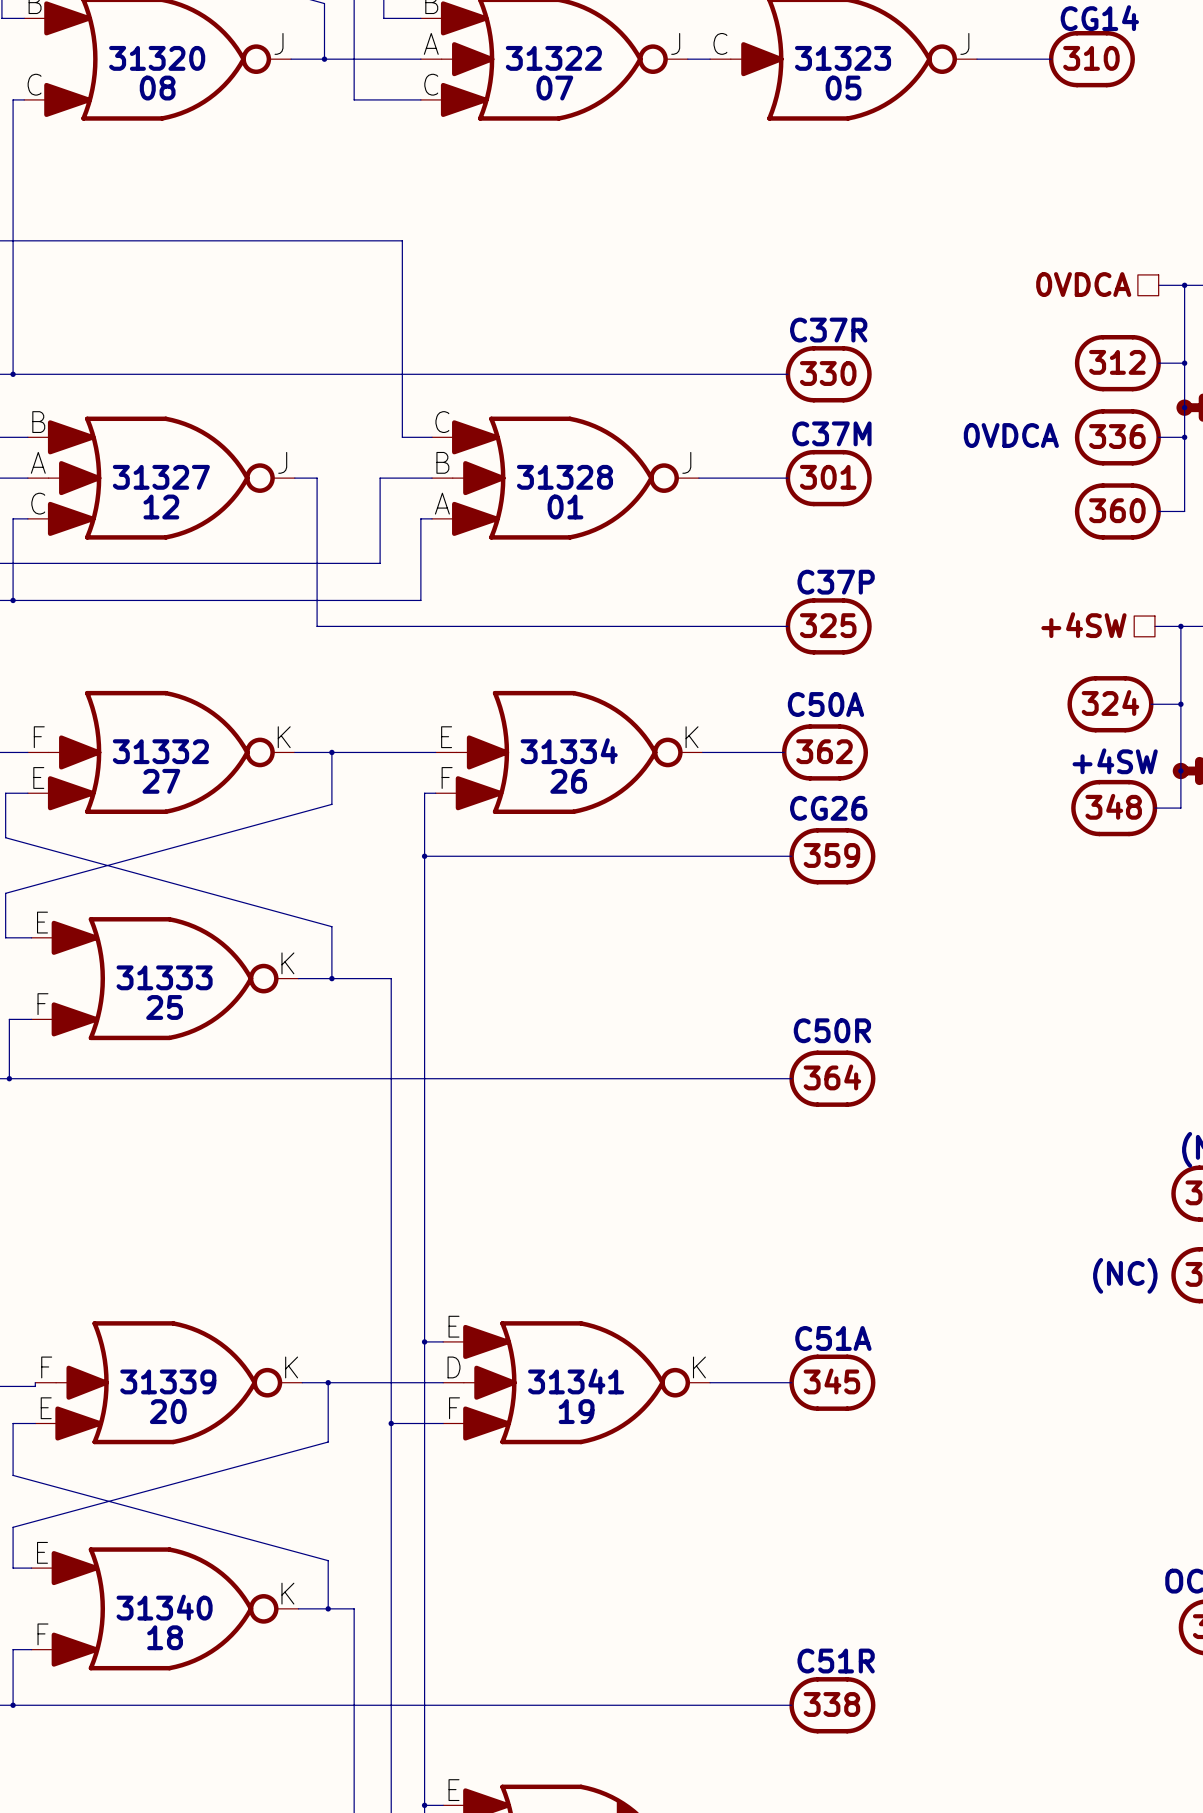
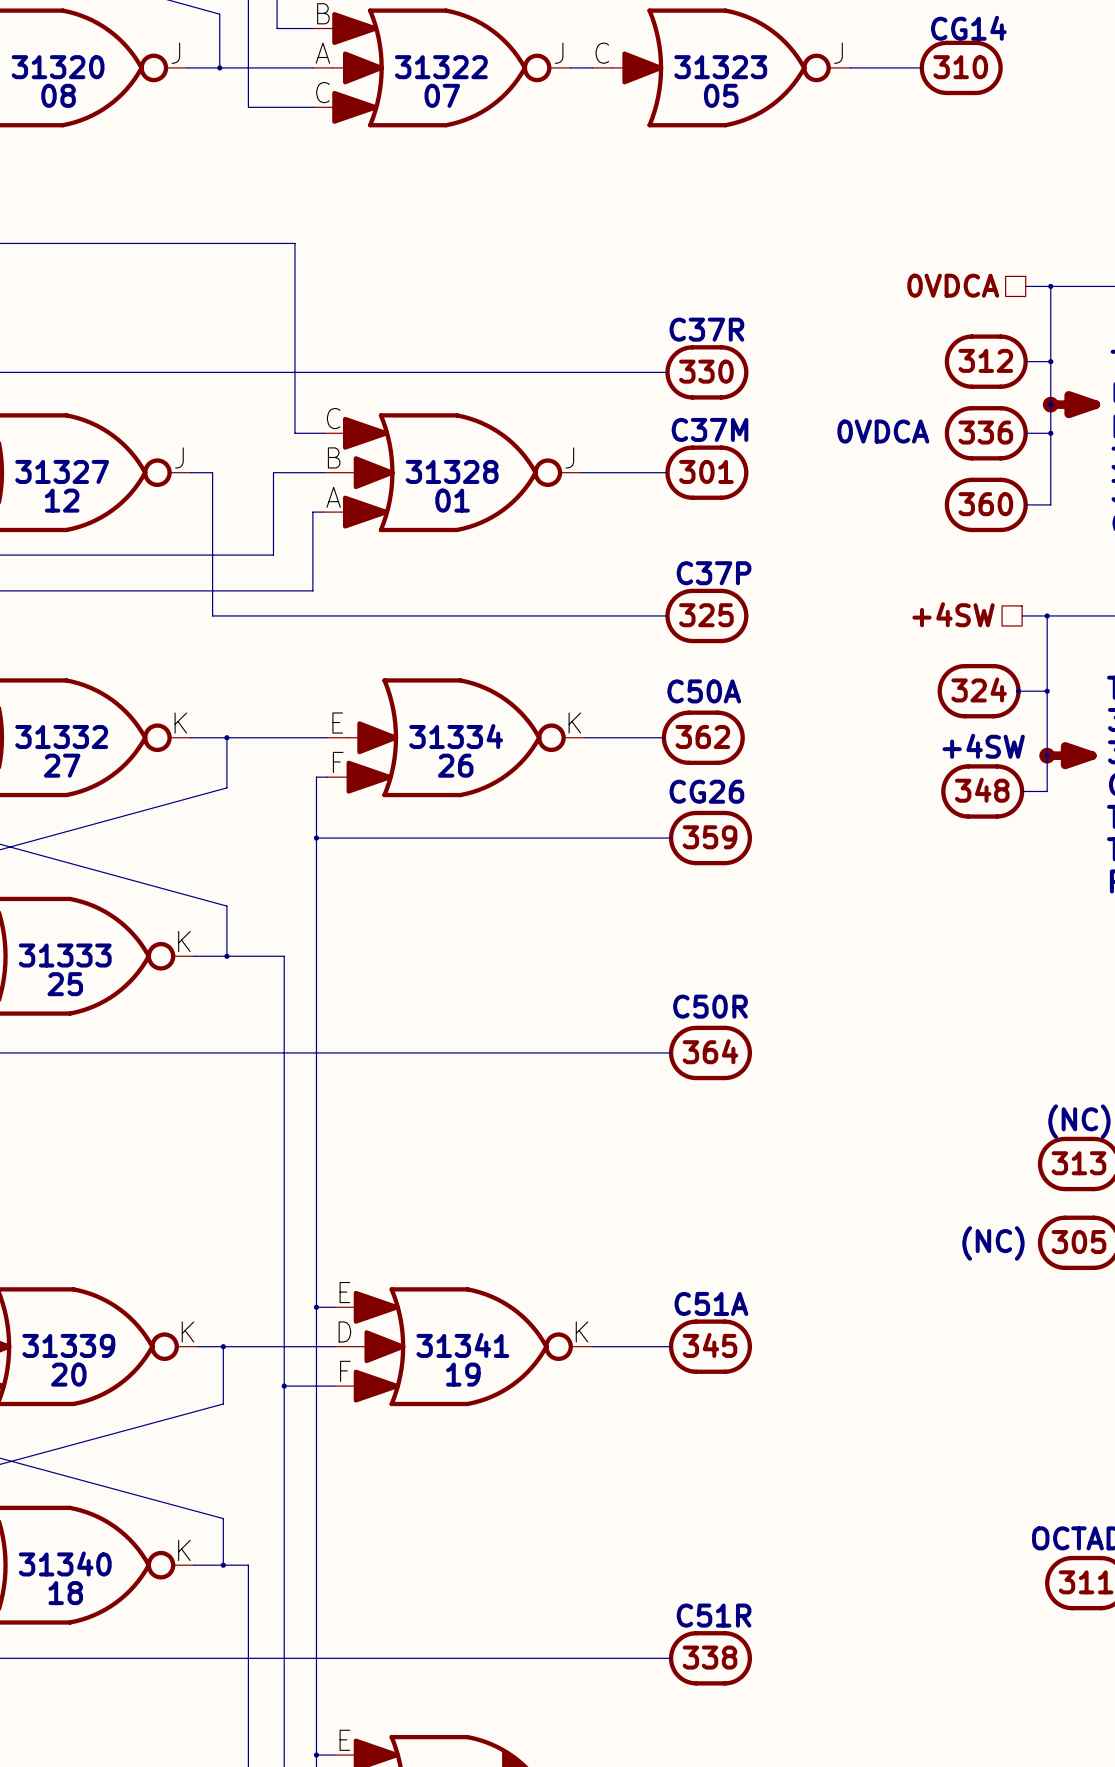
junction: none -> (1018, 691)

